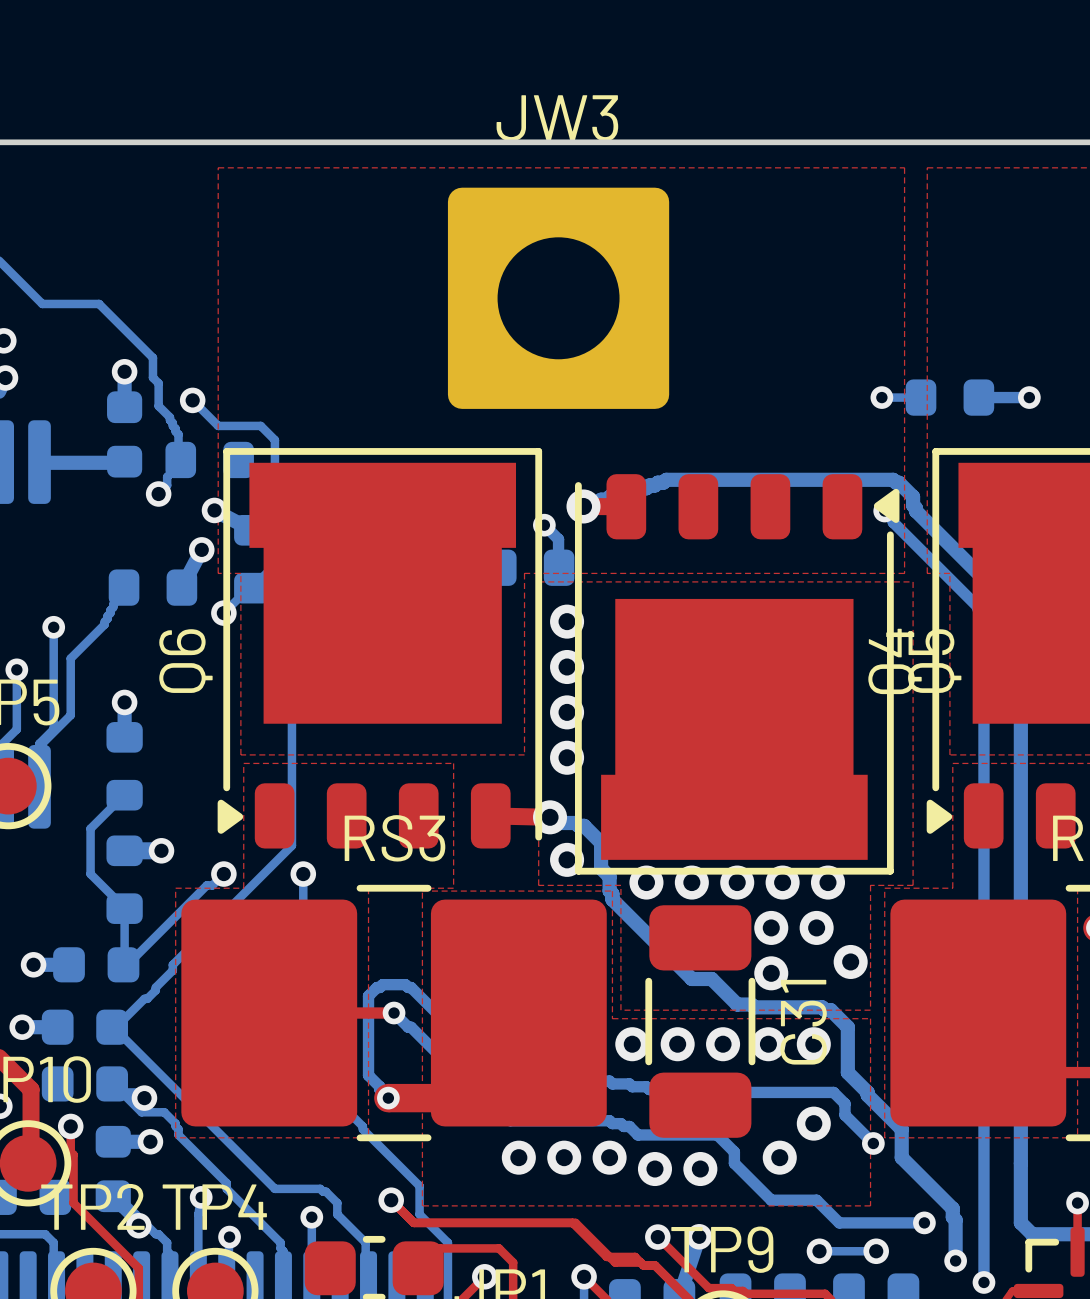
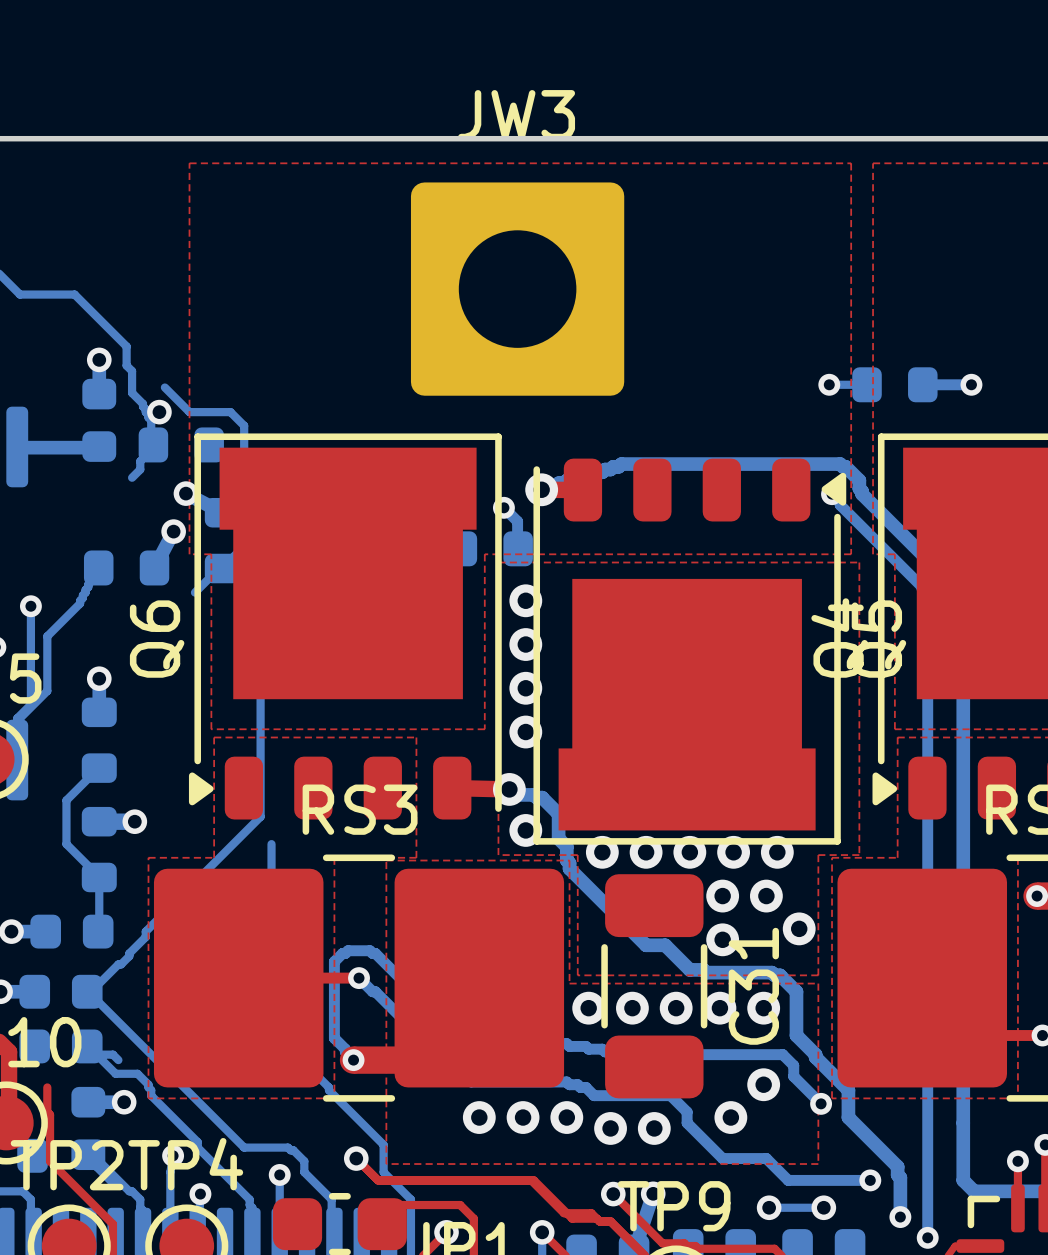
via position: (192, 400) -> (159, 412)
via: (158, 493) -> none
via: (223, 613) -> none
bottom track: (223, 874) (212, 885) (206, 885) (127, 964) (123, 964) -> none
via: (223, 874) -> none
via: (303, 874) -> none
via: (144, 1098) -> none
via: (70, 1126) -> none
via: (138, 1225) -> none

